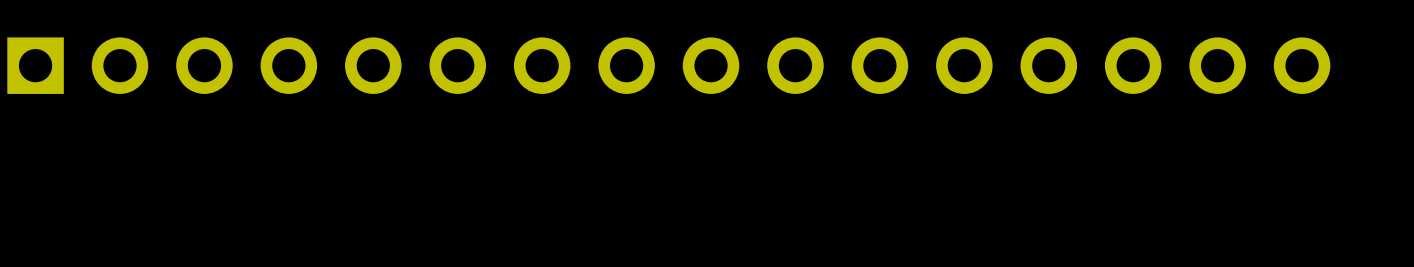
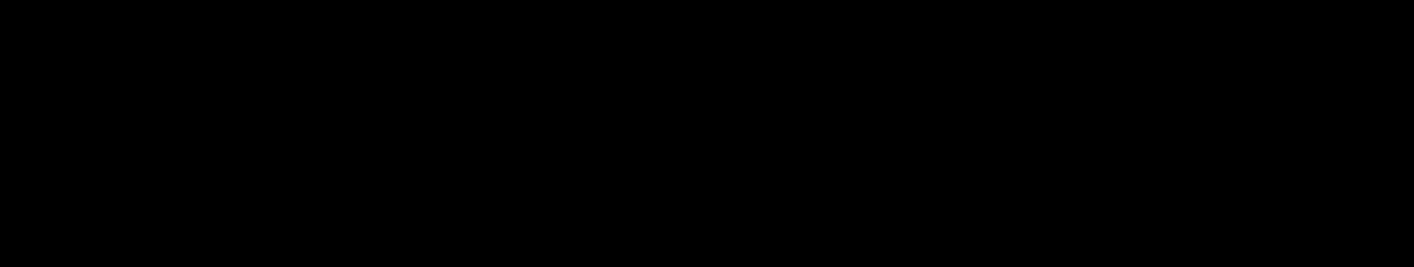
part: (668, 65) -> none

